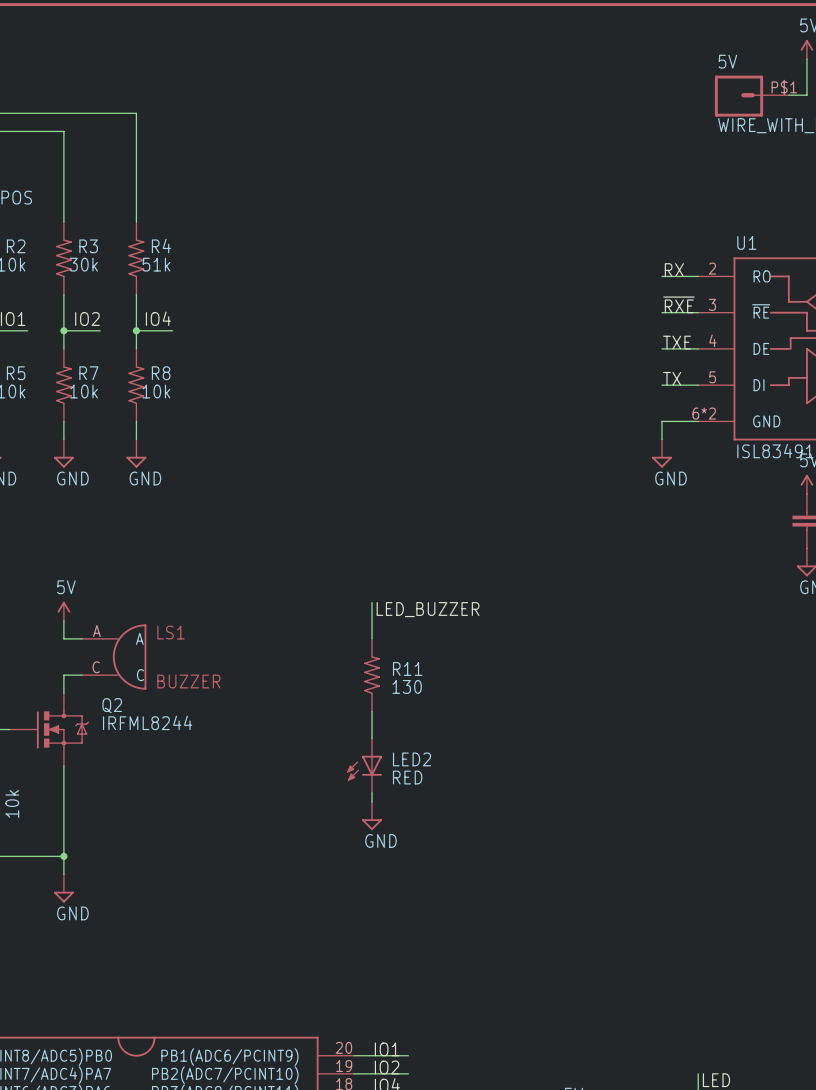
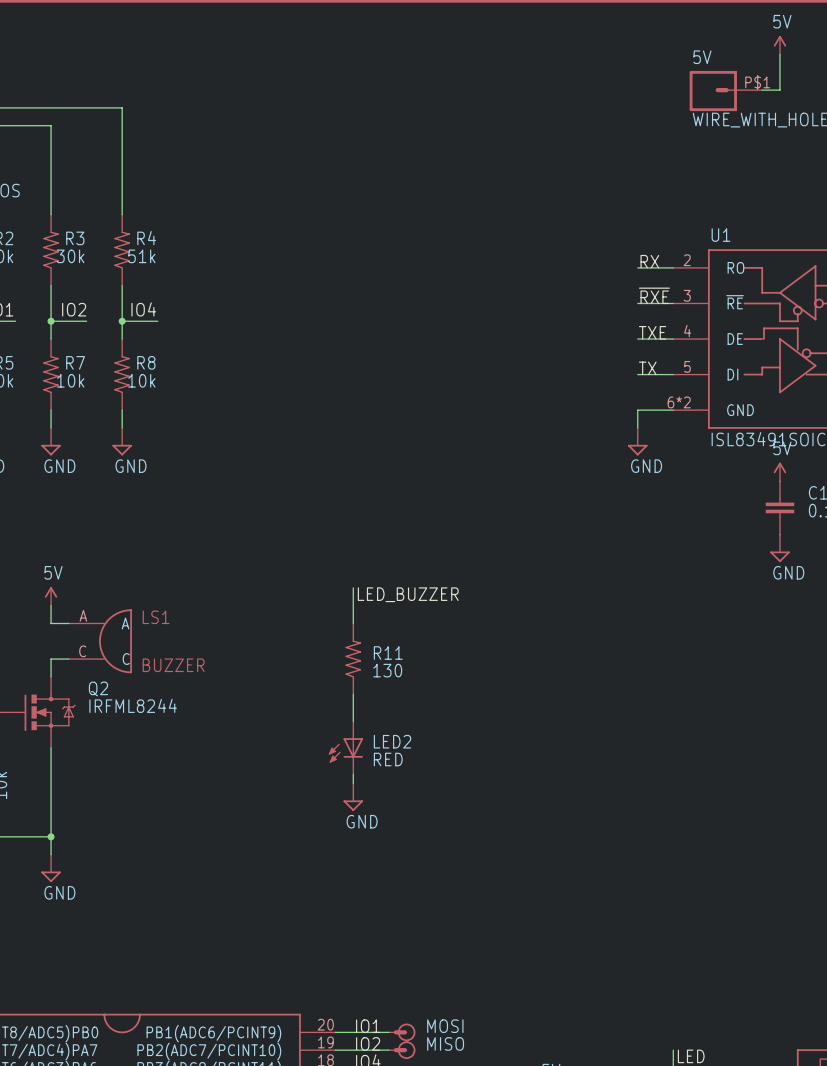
MOSI: none -> (402, 1032)
MISO: none -> (402, 1050)

